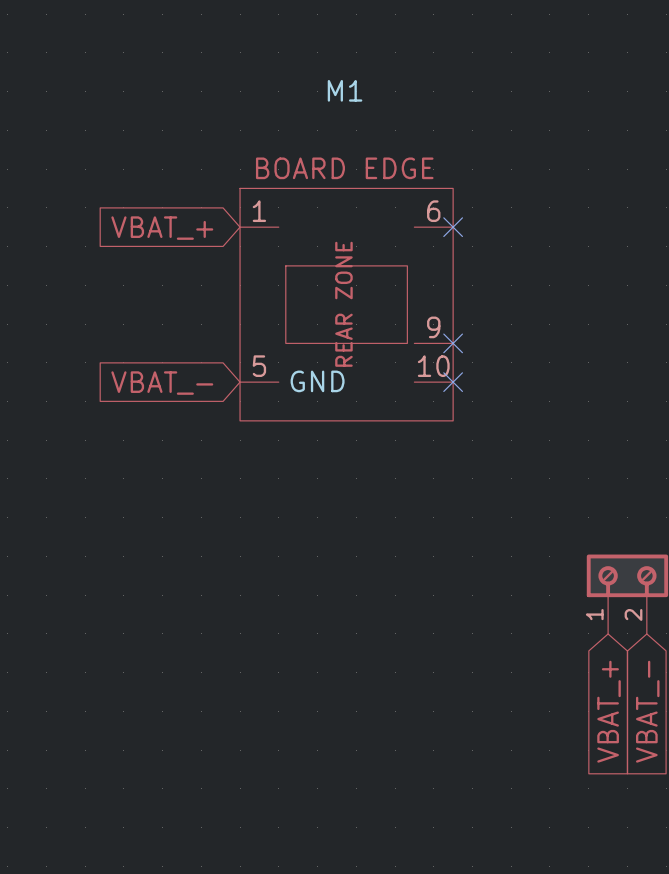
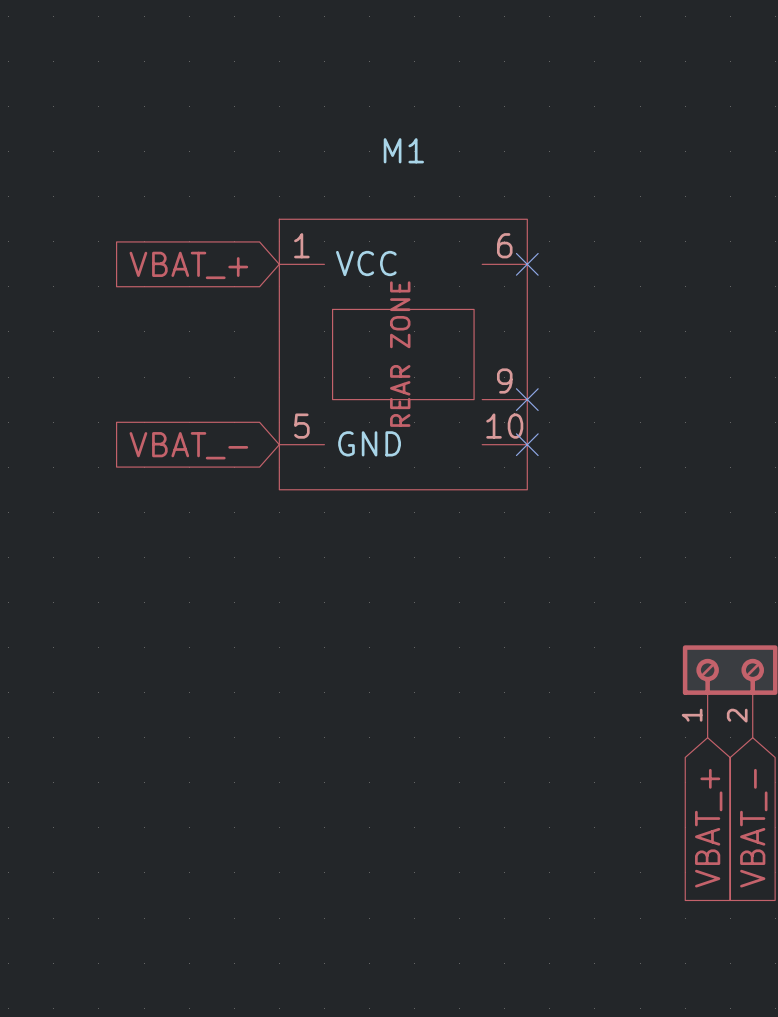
M1 name position: M1 (345, 90) -> M1 (403, 150)
M1 text: BOARD EDGE (344, 168) -> none
M1 pin name: none -> VCC (366, 263)

